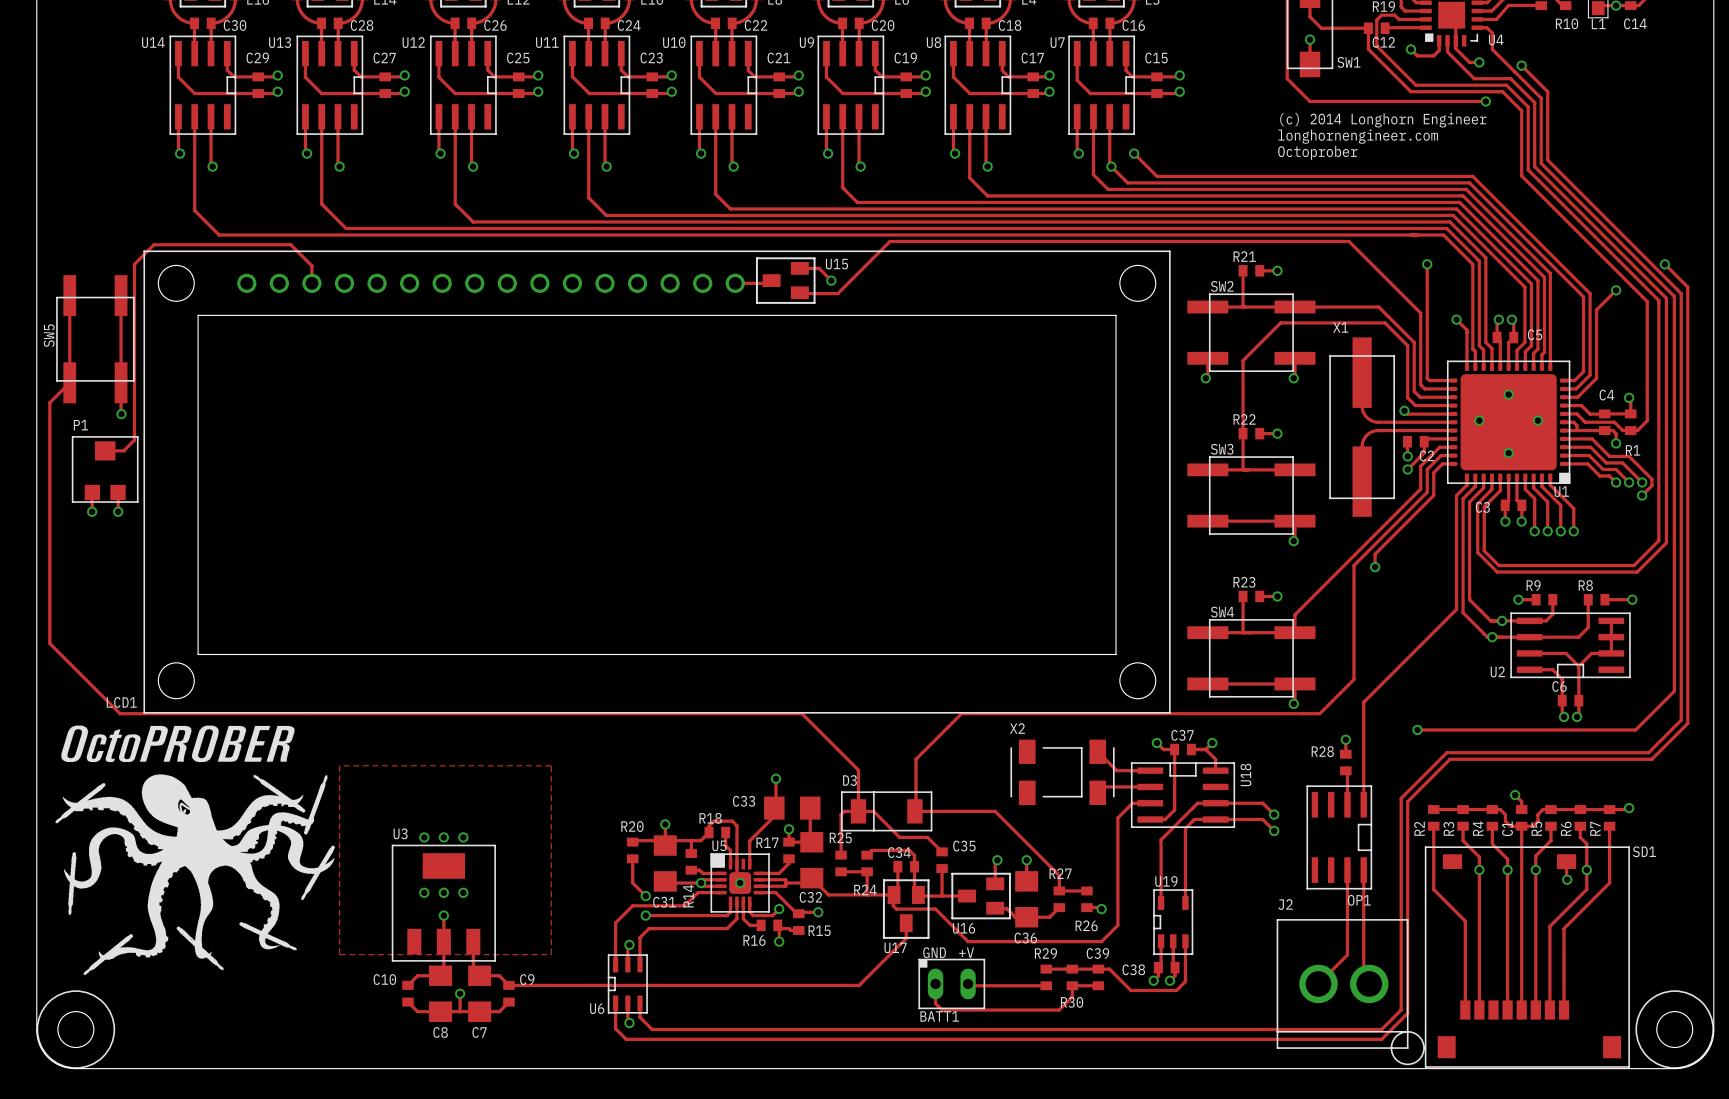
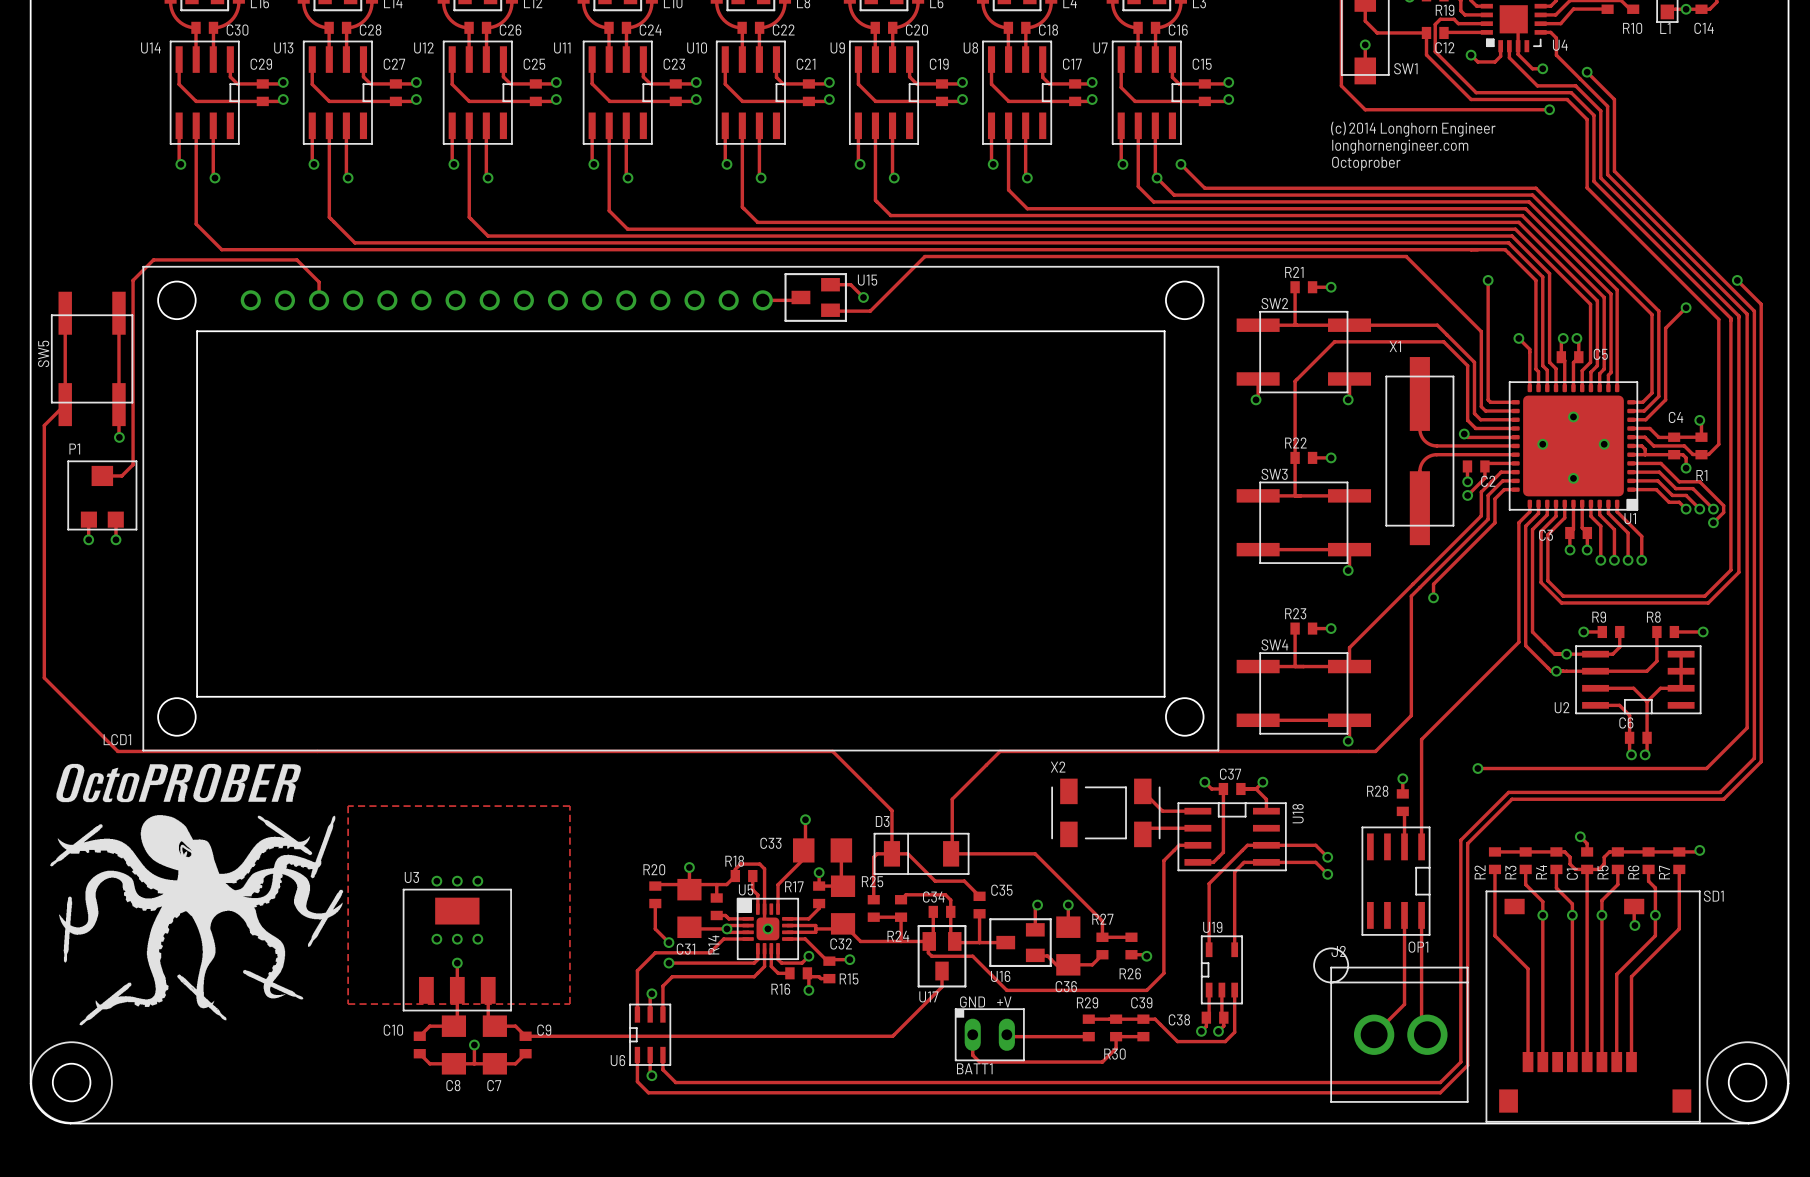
LCD1 footprint: [143, 250, 1171, 714] -> [142, 265, 1220, 752]
J2 footprint: [1276, 919, 1425, 1066] -> [1313, 947, 1469, 1103]

